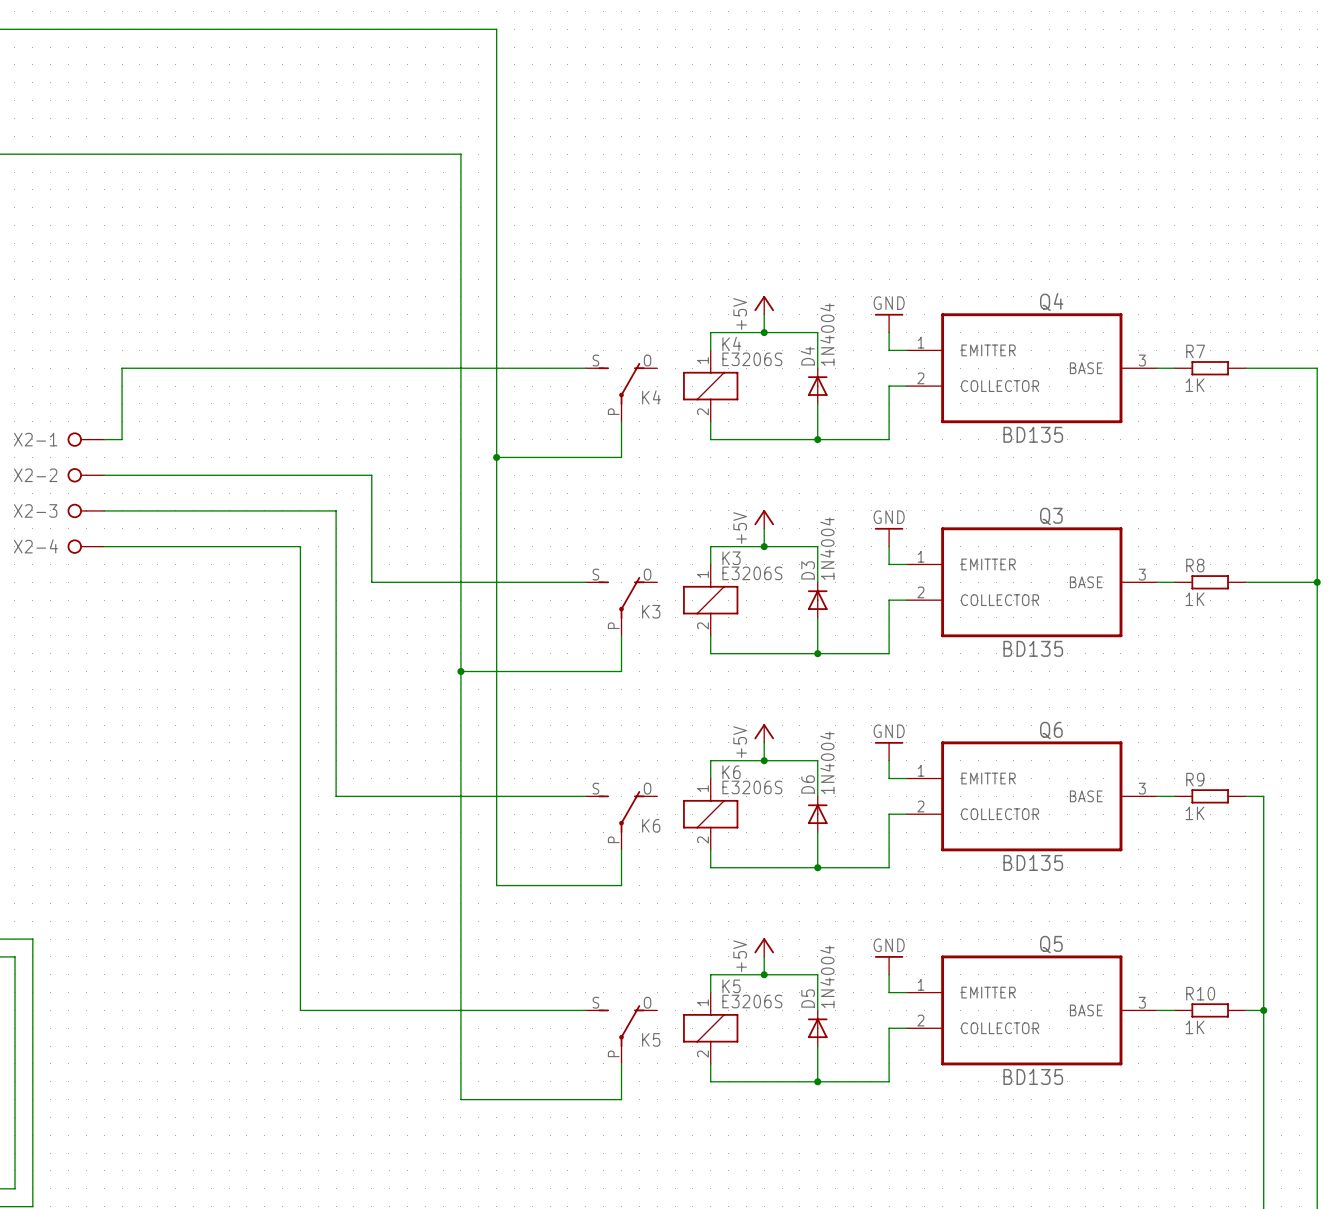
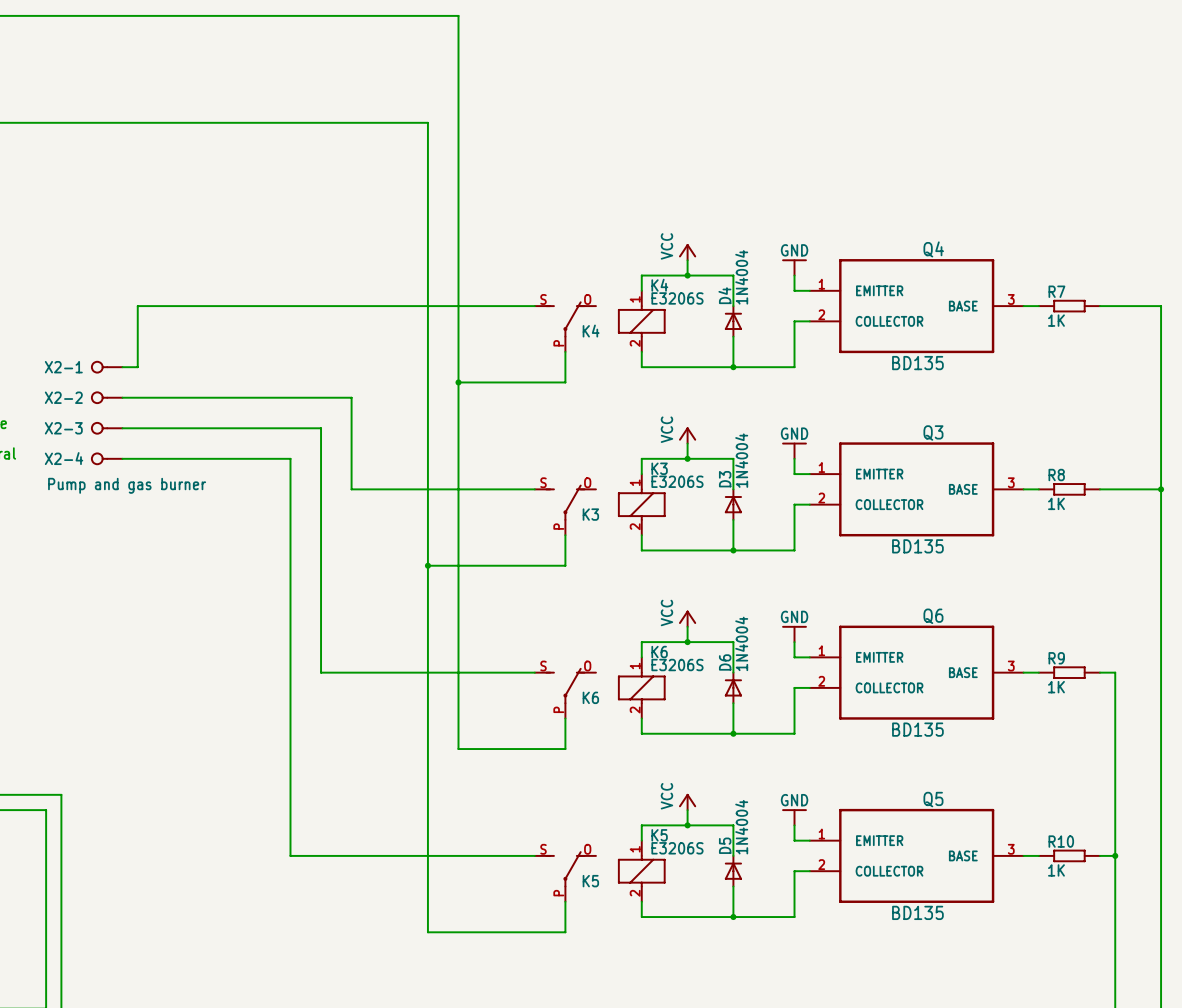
power symbol: +5V (764, 305) -> VCC (687, 252)
power symbol: +5V (764, 519) -> VCC (687, 435)
X2-4 value: none -> Pump and gas burner (127, 485)
power symbol: +5V (764, 733) -> VCC (687, 618)
power symbol: +5V (764, 947) -> VCC (687, 802)

